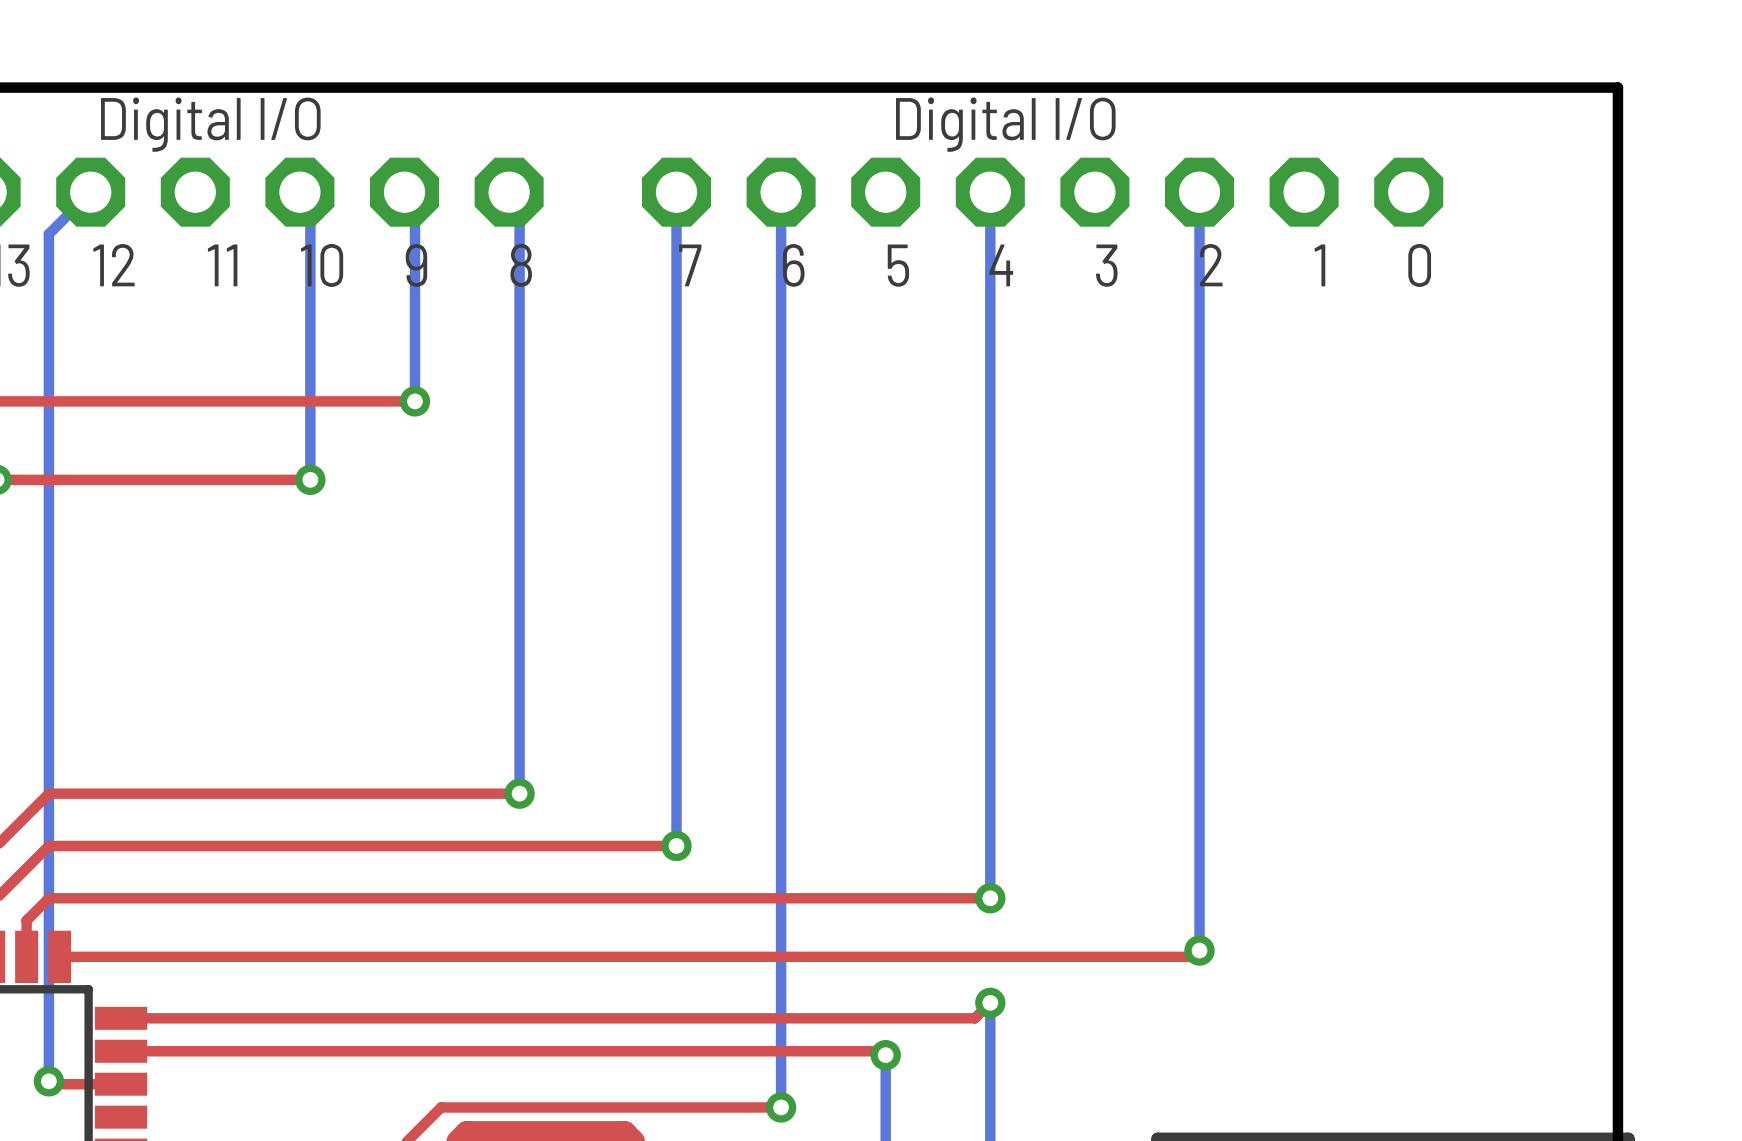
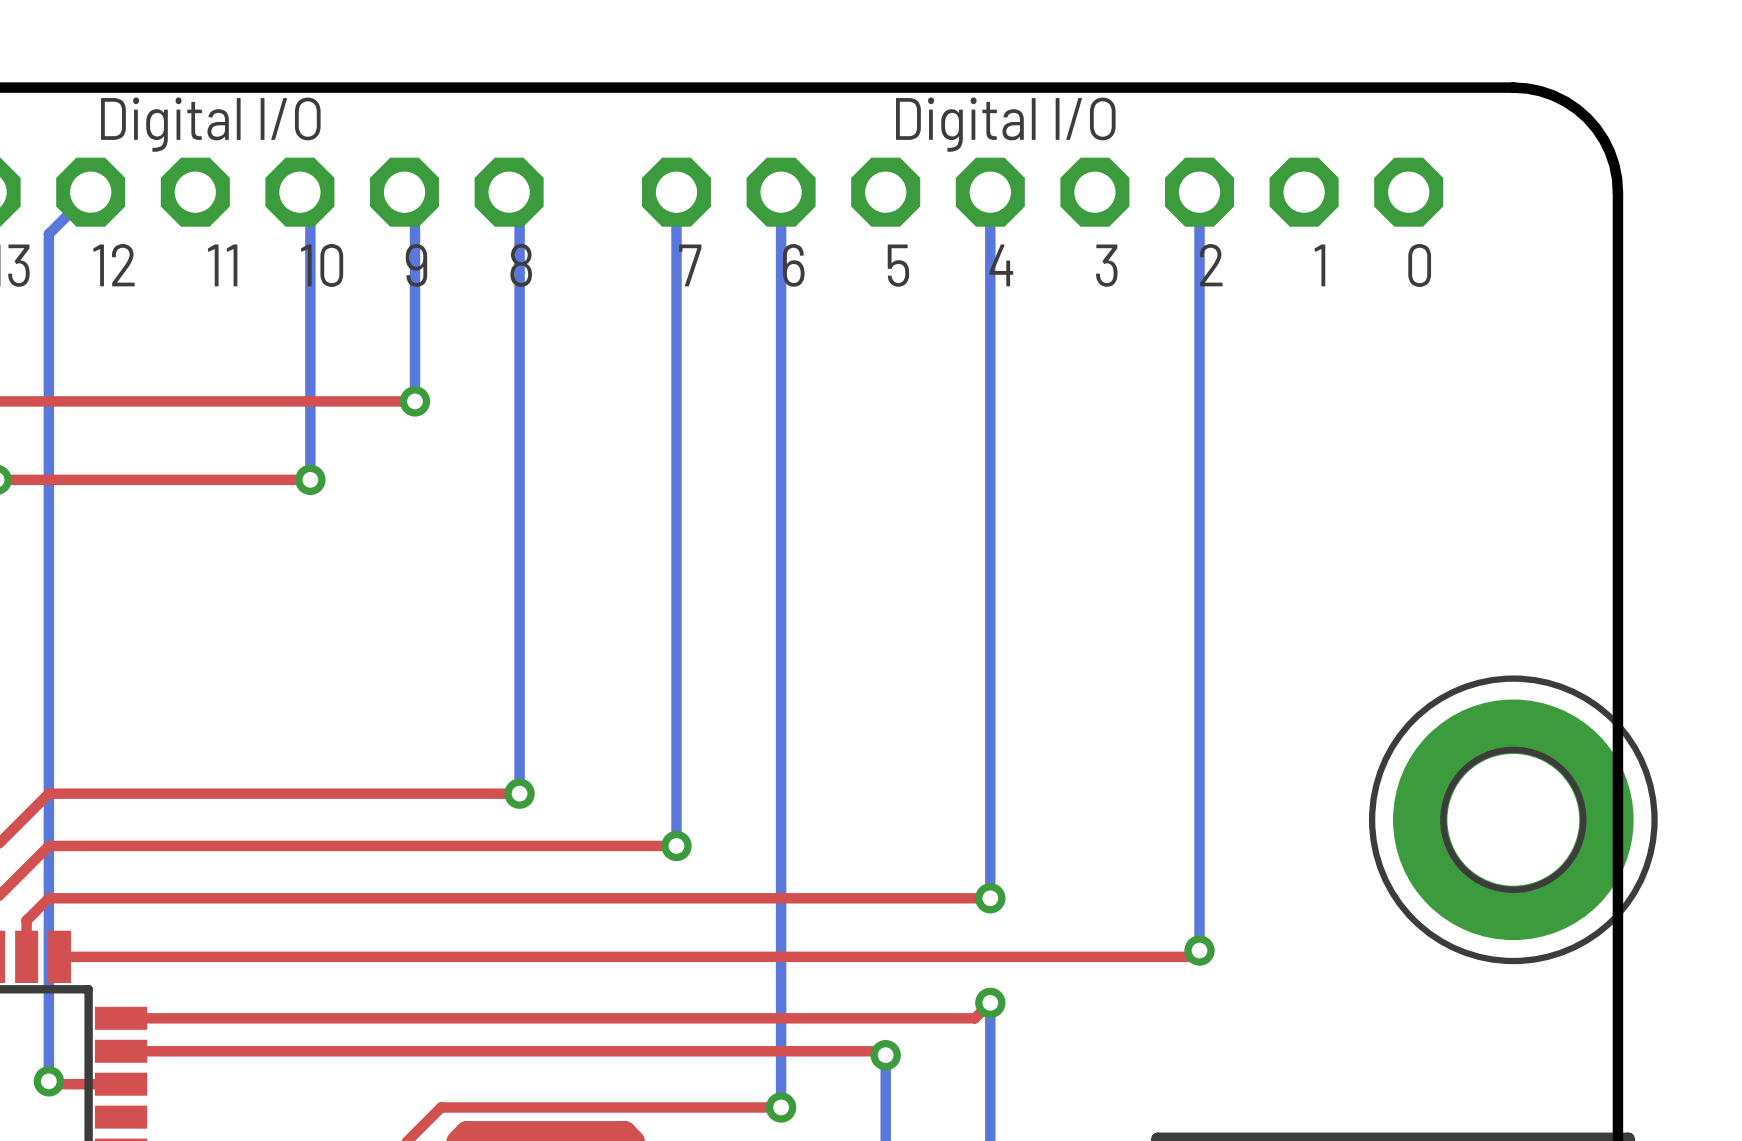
board edge: (1513, 87) (1617, 87) (1617, 192) -> (1513, 87) (1540, 91) (1553, 95) (1577, 109) (1587, 118) (1596, 128) (1609, 152) (1614, 165) (1617, 192)
part: none -> (1513, 819)

